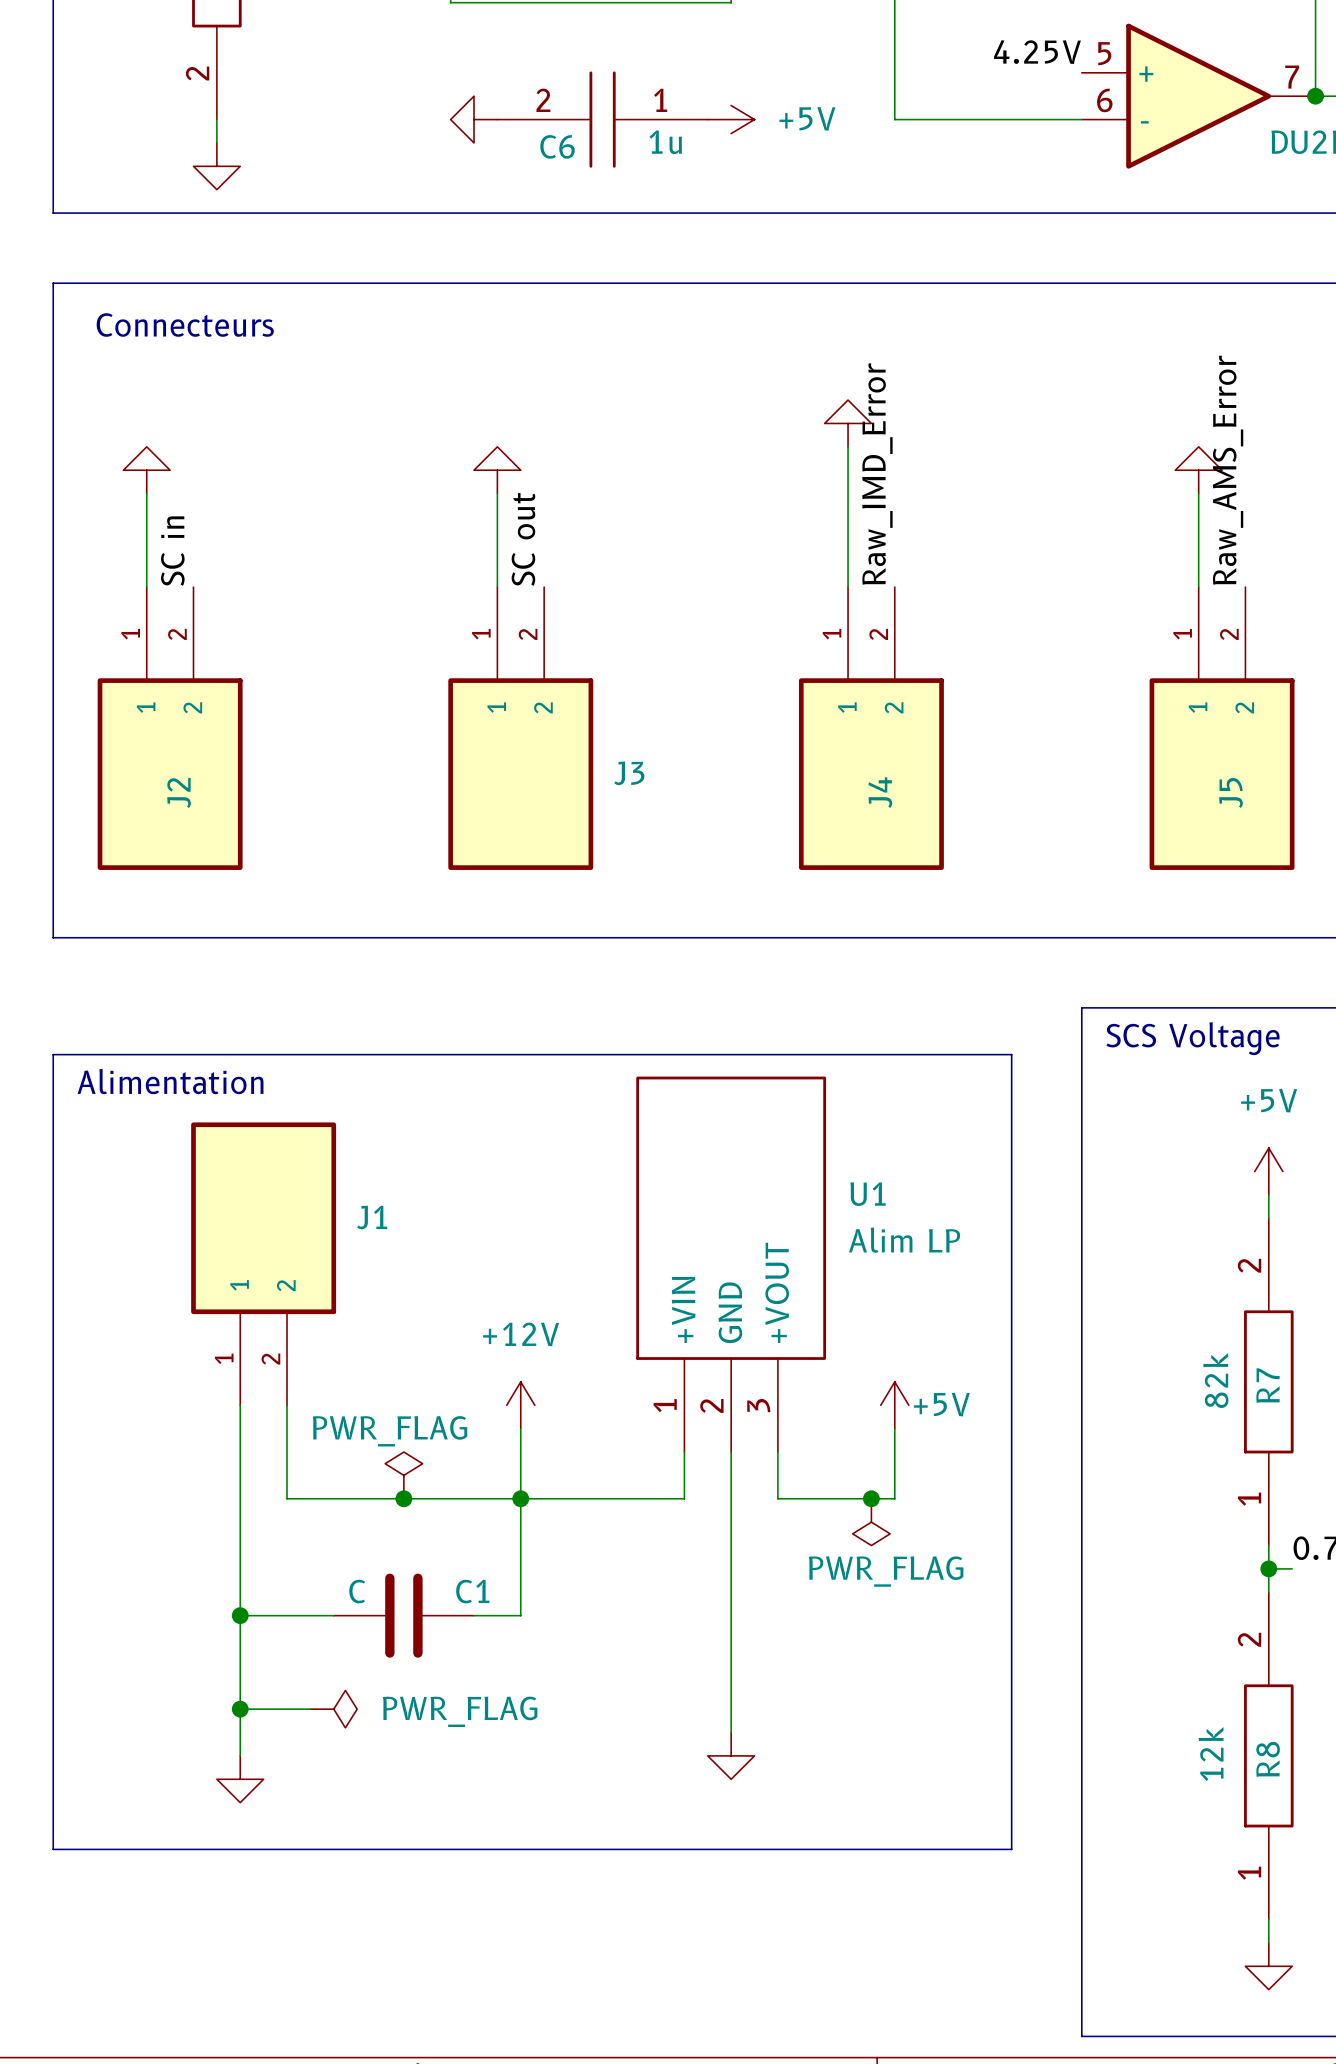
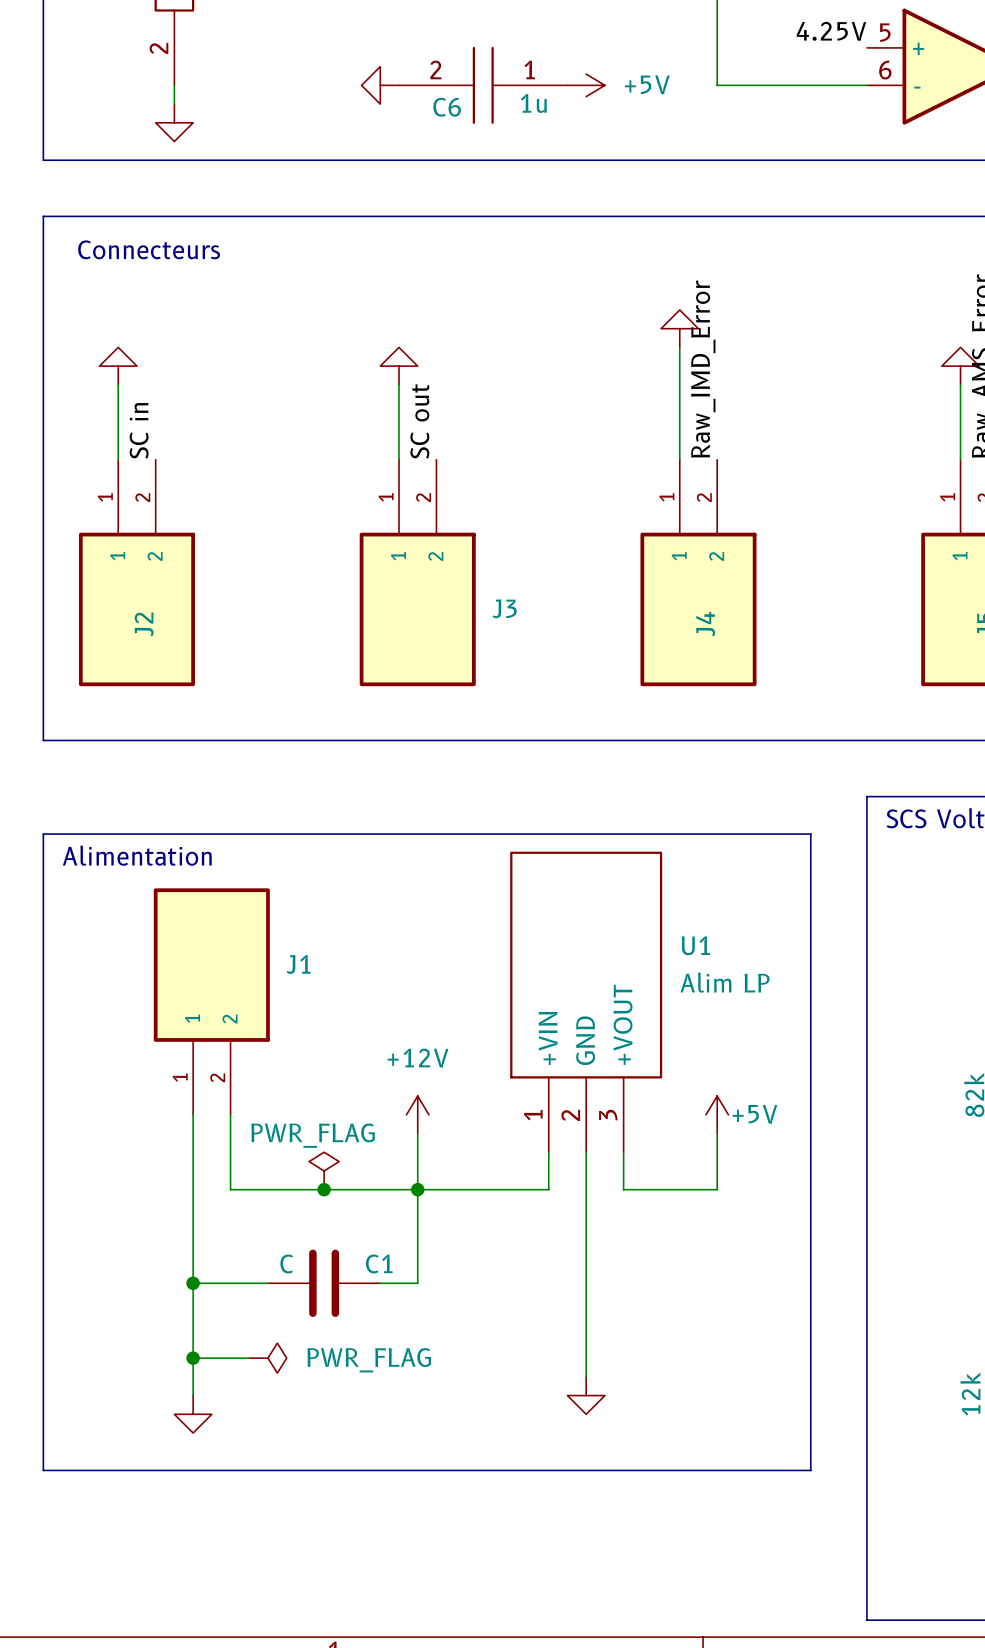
junction: (871, 1498) -> none
power symbol: PWR_FLAG (871, 1522) -> none

